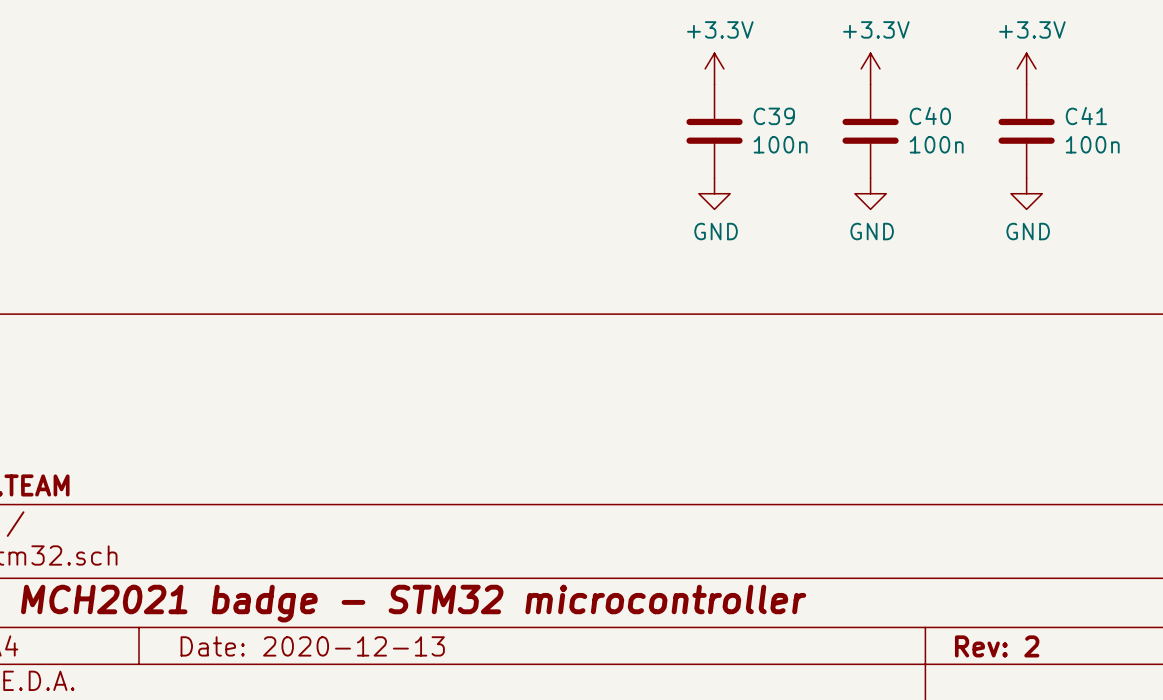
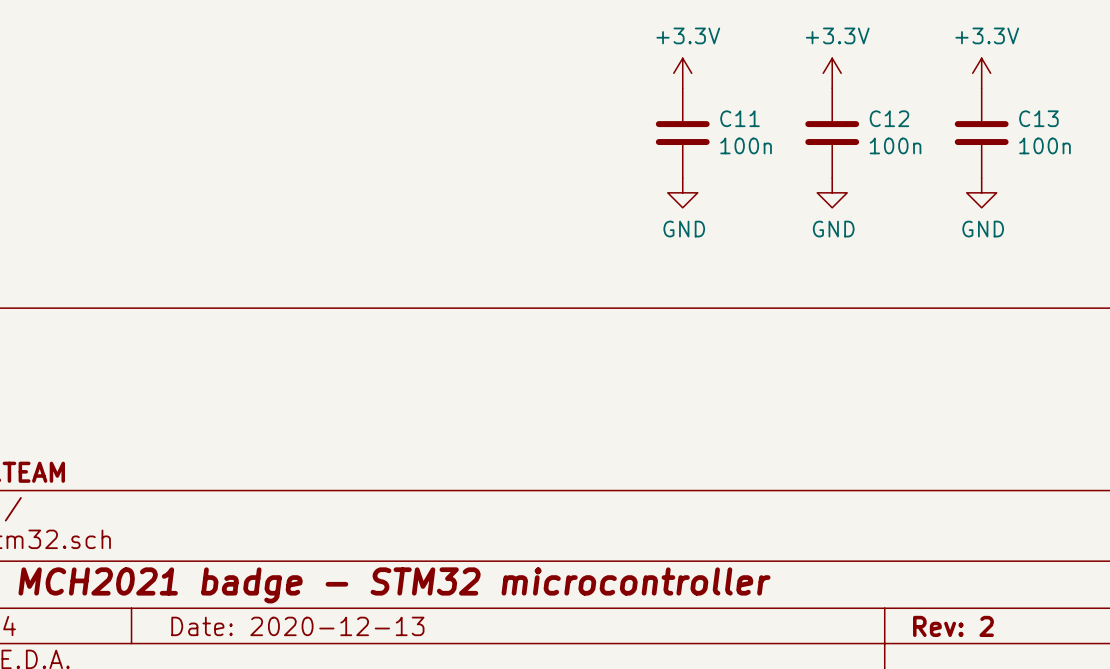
C39 name: C39 (774, 116) -> C11 (740, 118)
C40 name: C40 (930, 116) -> C12 (889, 118)
C41 name: C41 (1086, 116) -> C13 (1038, 118)

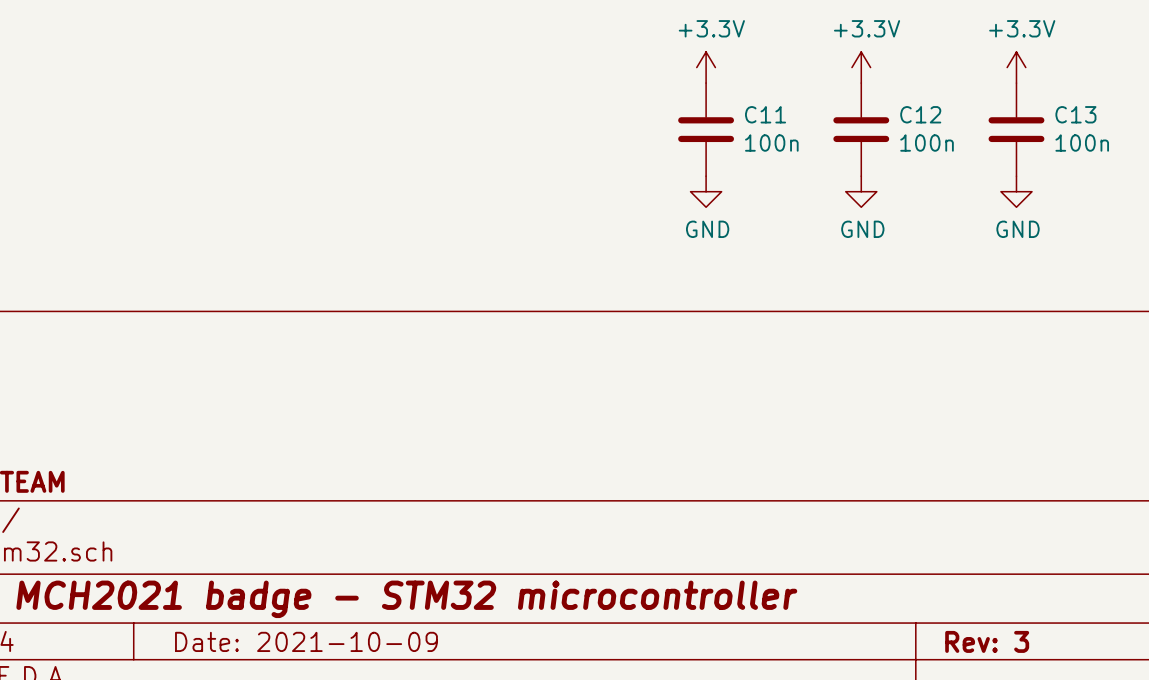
title block: Date: 2020-12-13 (297, 626) -> Date: 2021-10-09 (306, 641)
title block: Rev: 2 (953, 626) -> Rev: 3 (987, 641)

